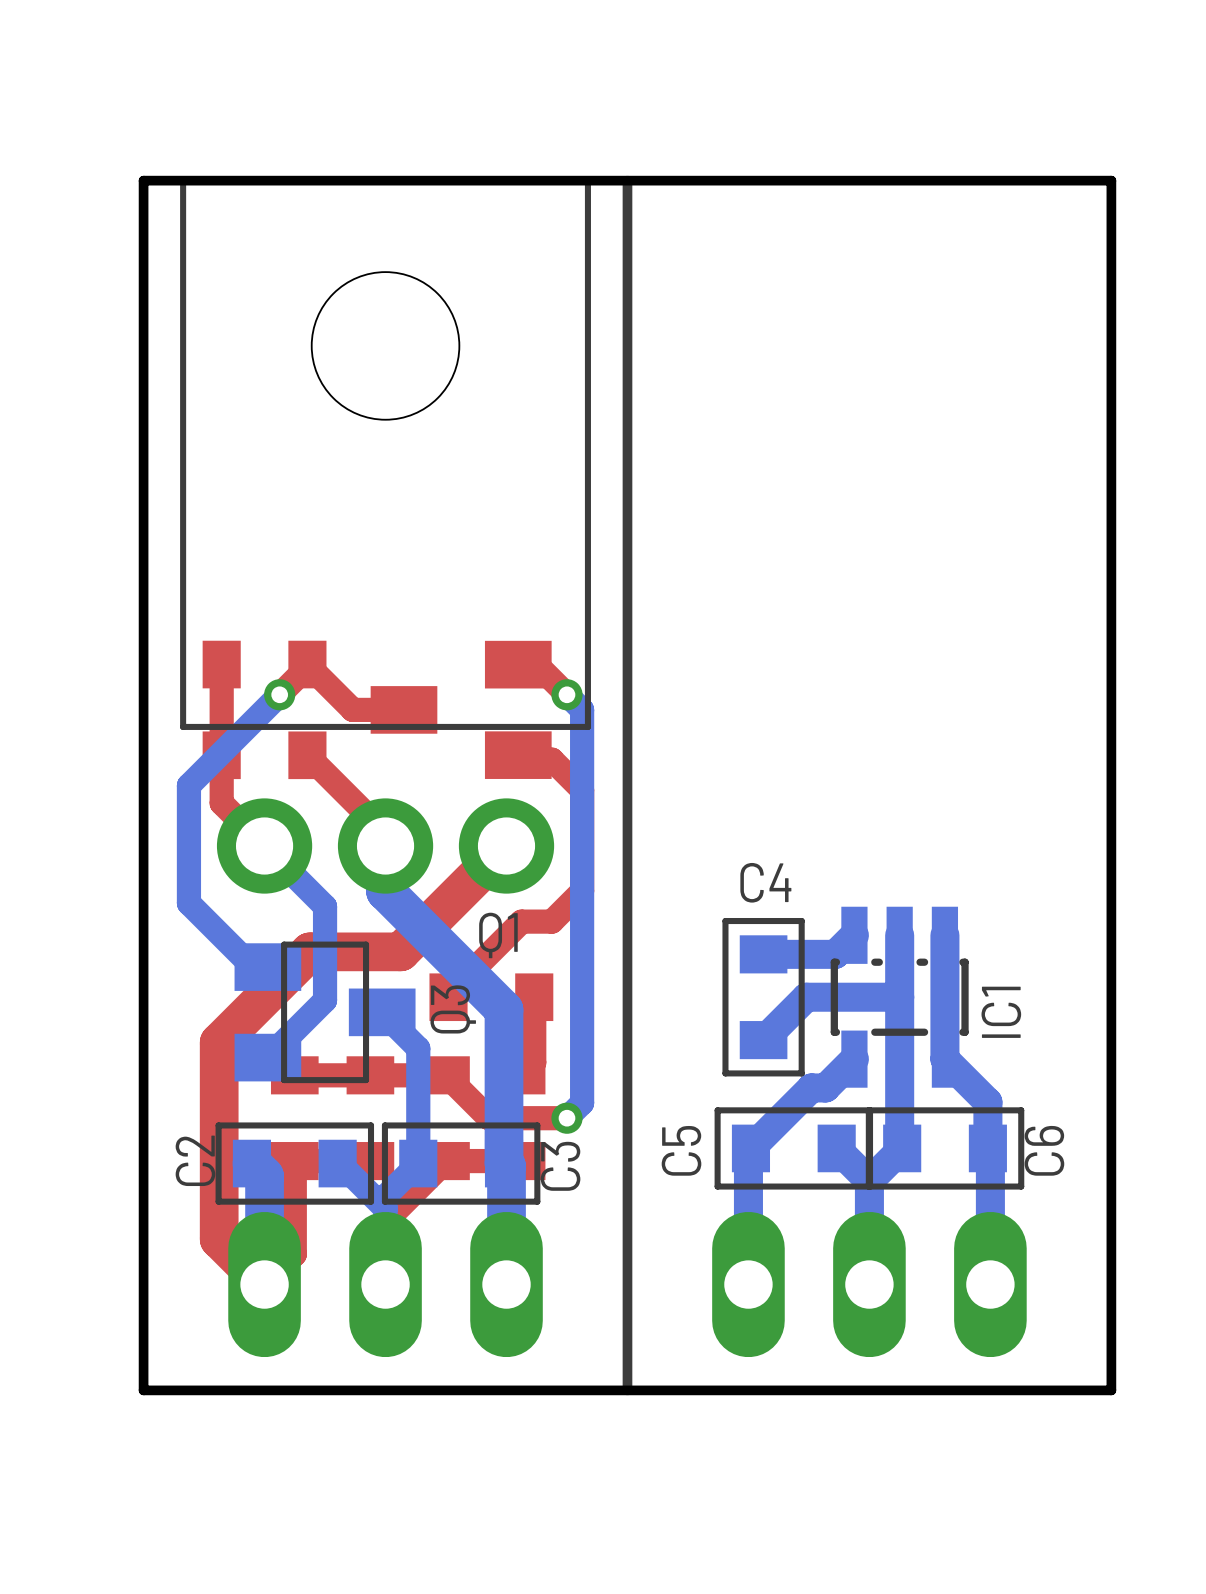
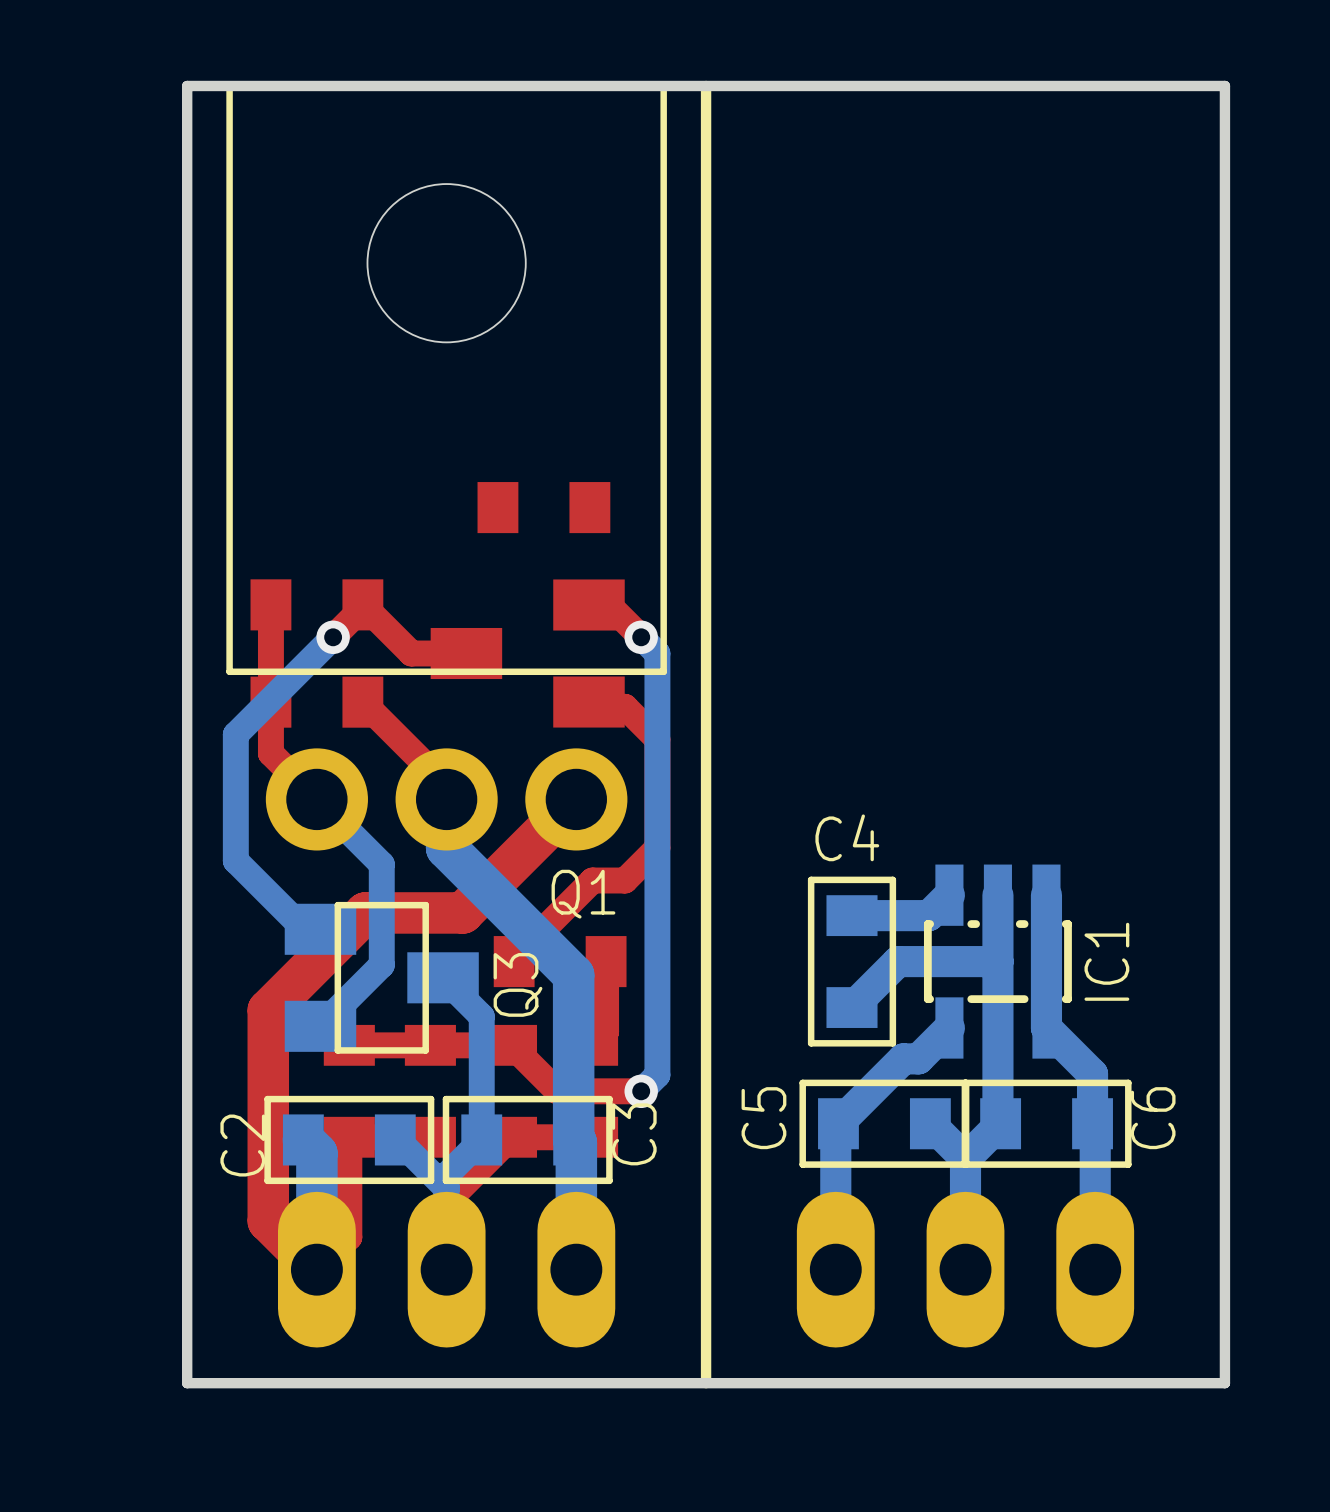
part: none -> (543, 507)

